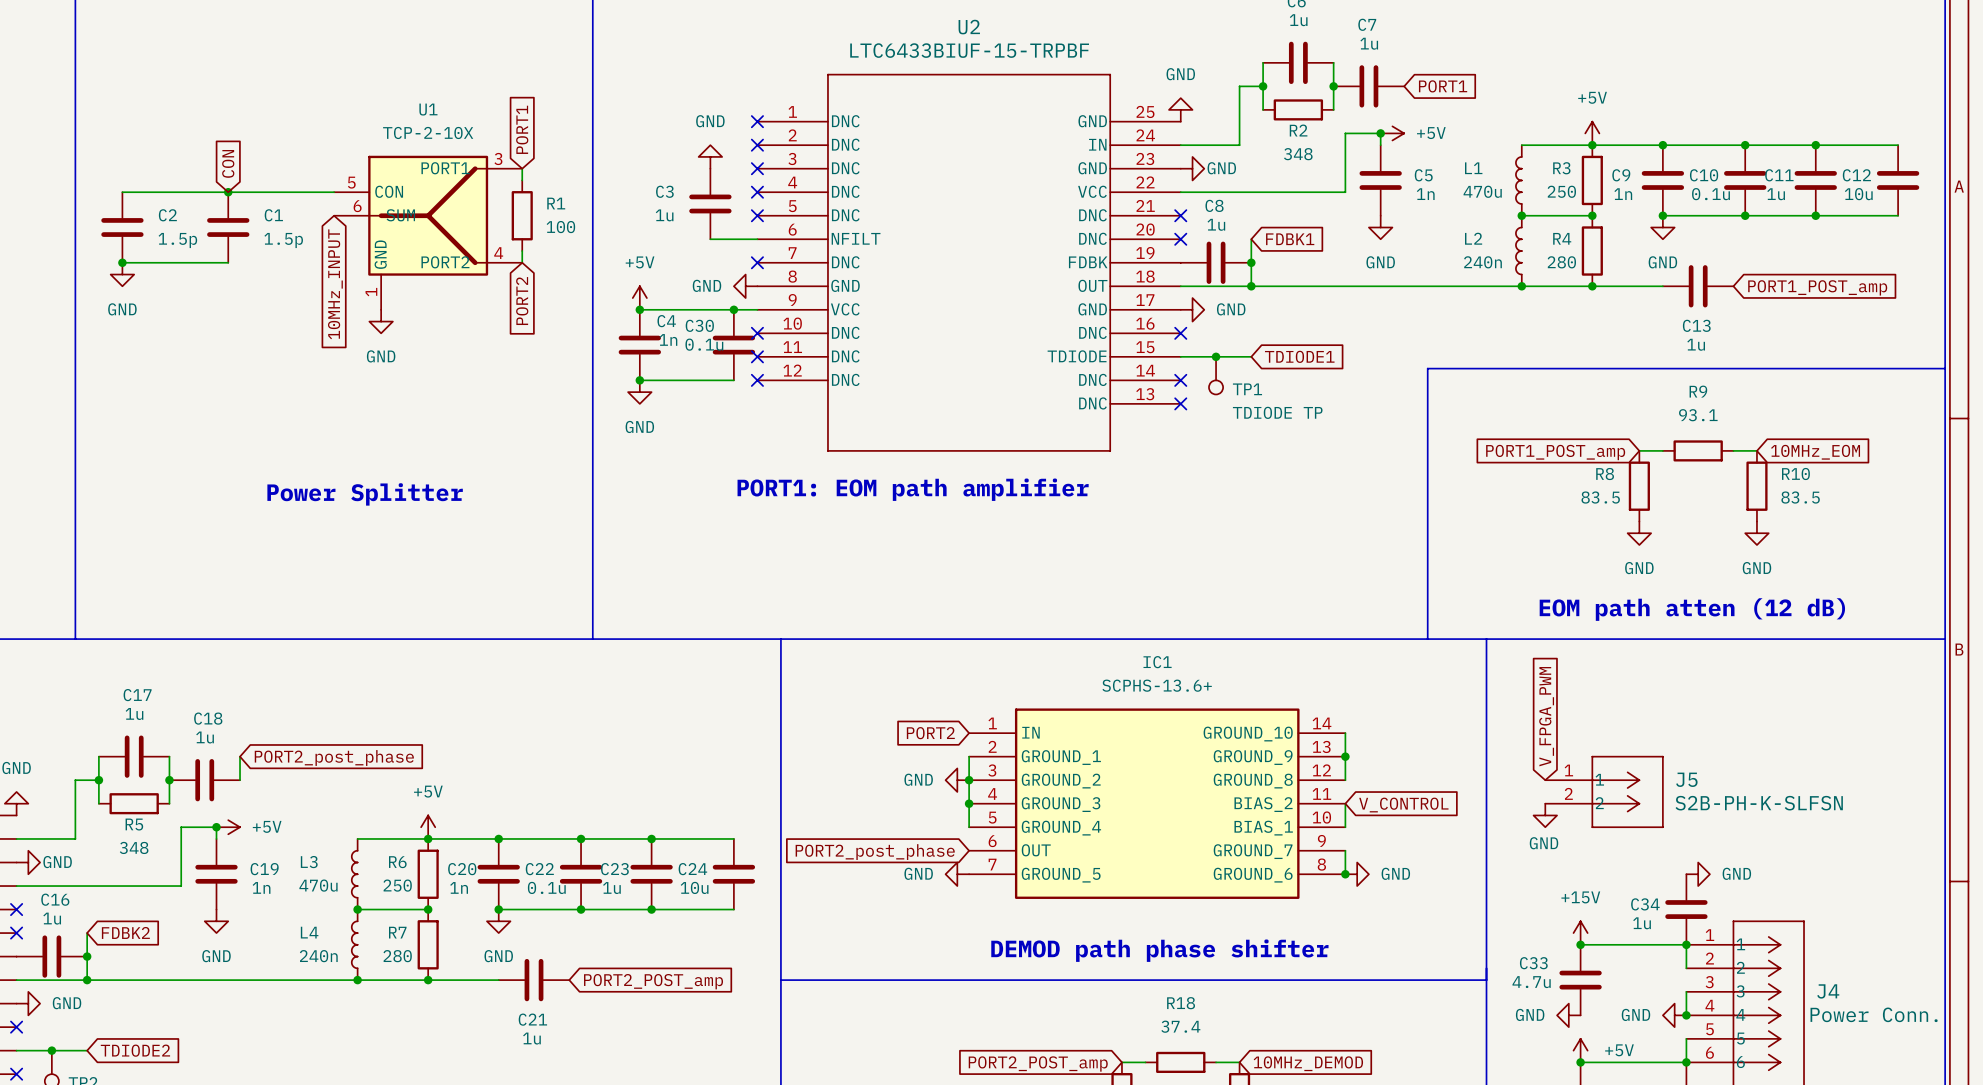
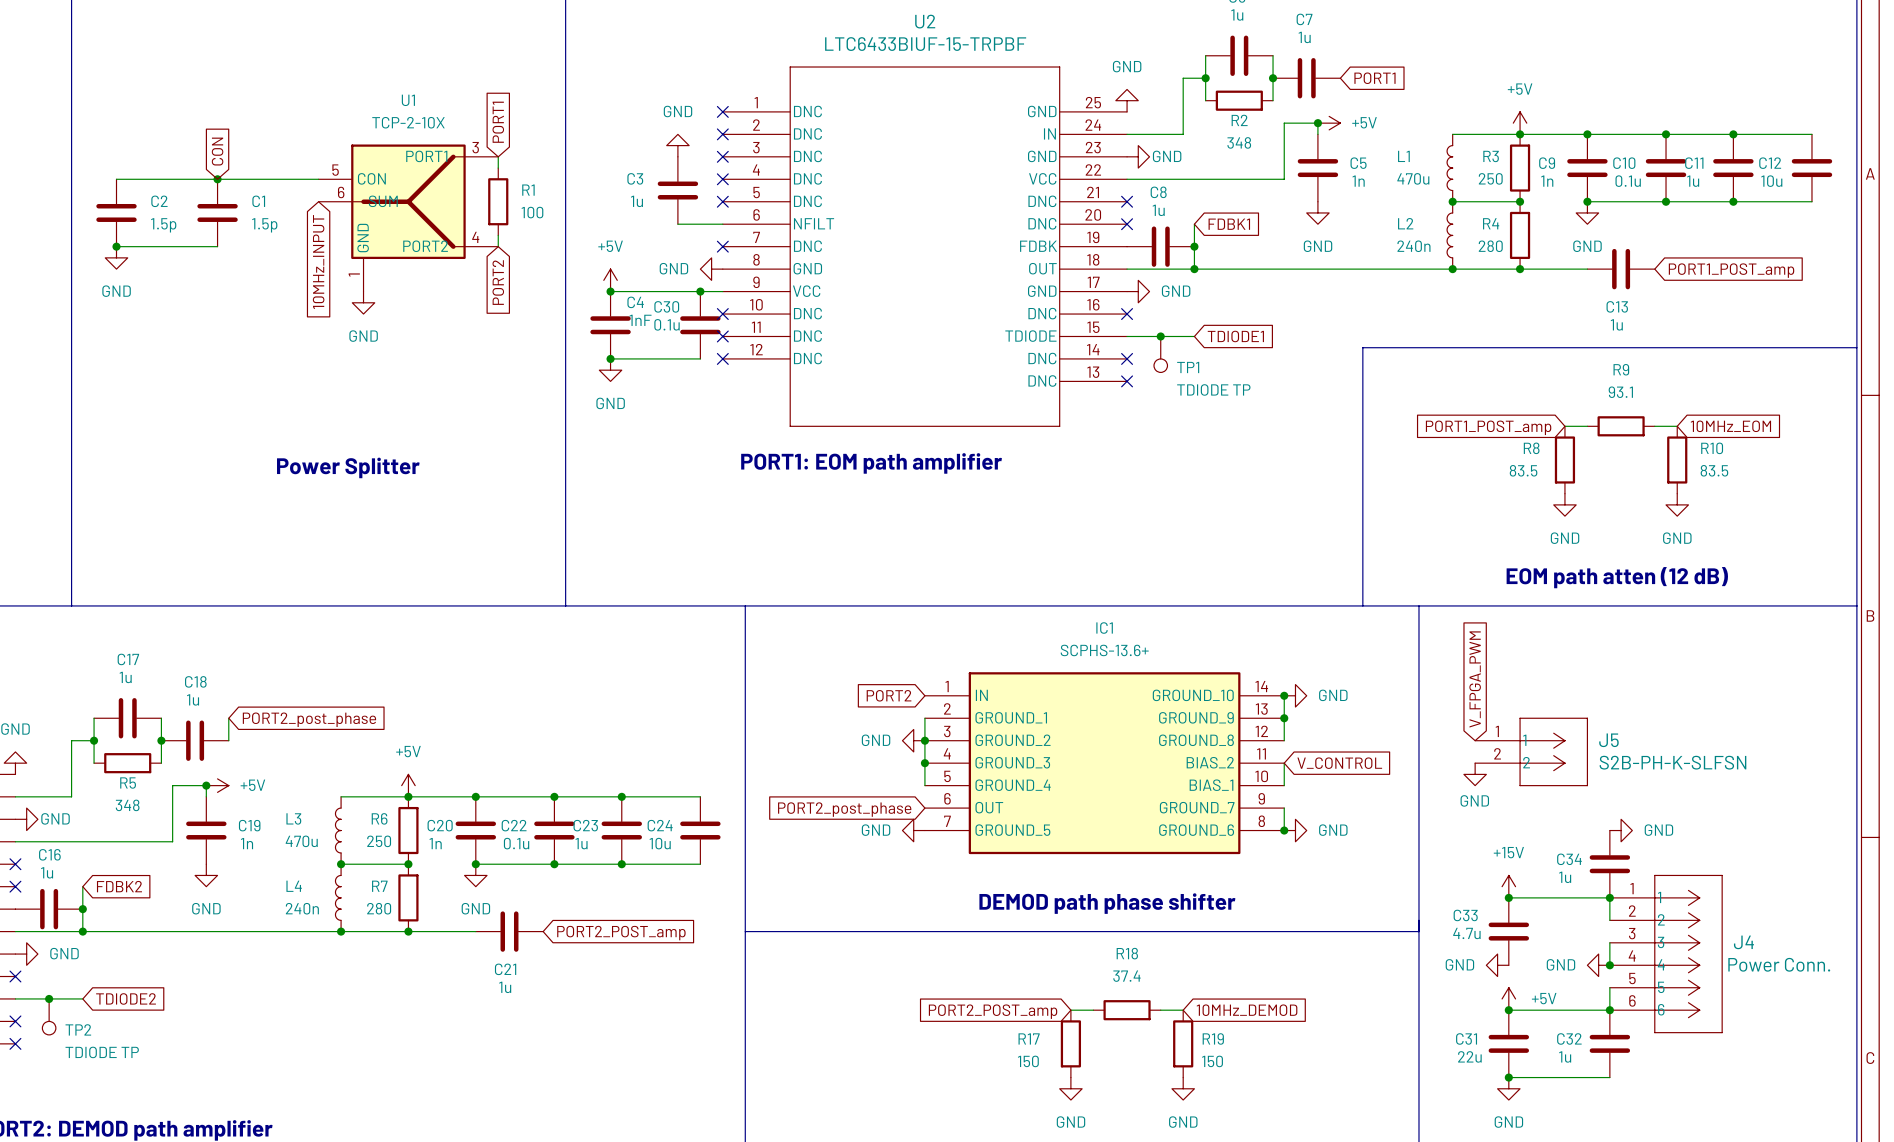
C4 value: 1n (668, 339) -> 1nF (640, 320)
junction: none -> (1284, 695)
power symbol: none -> GND (1295, 695)

